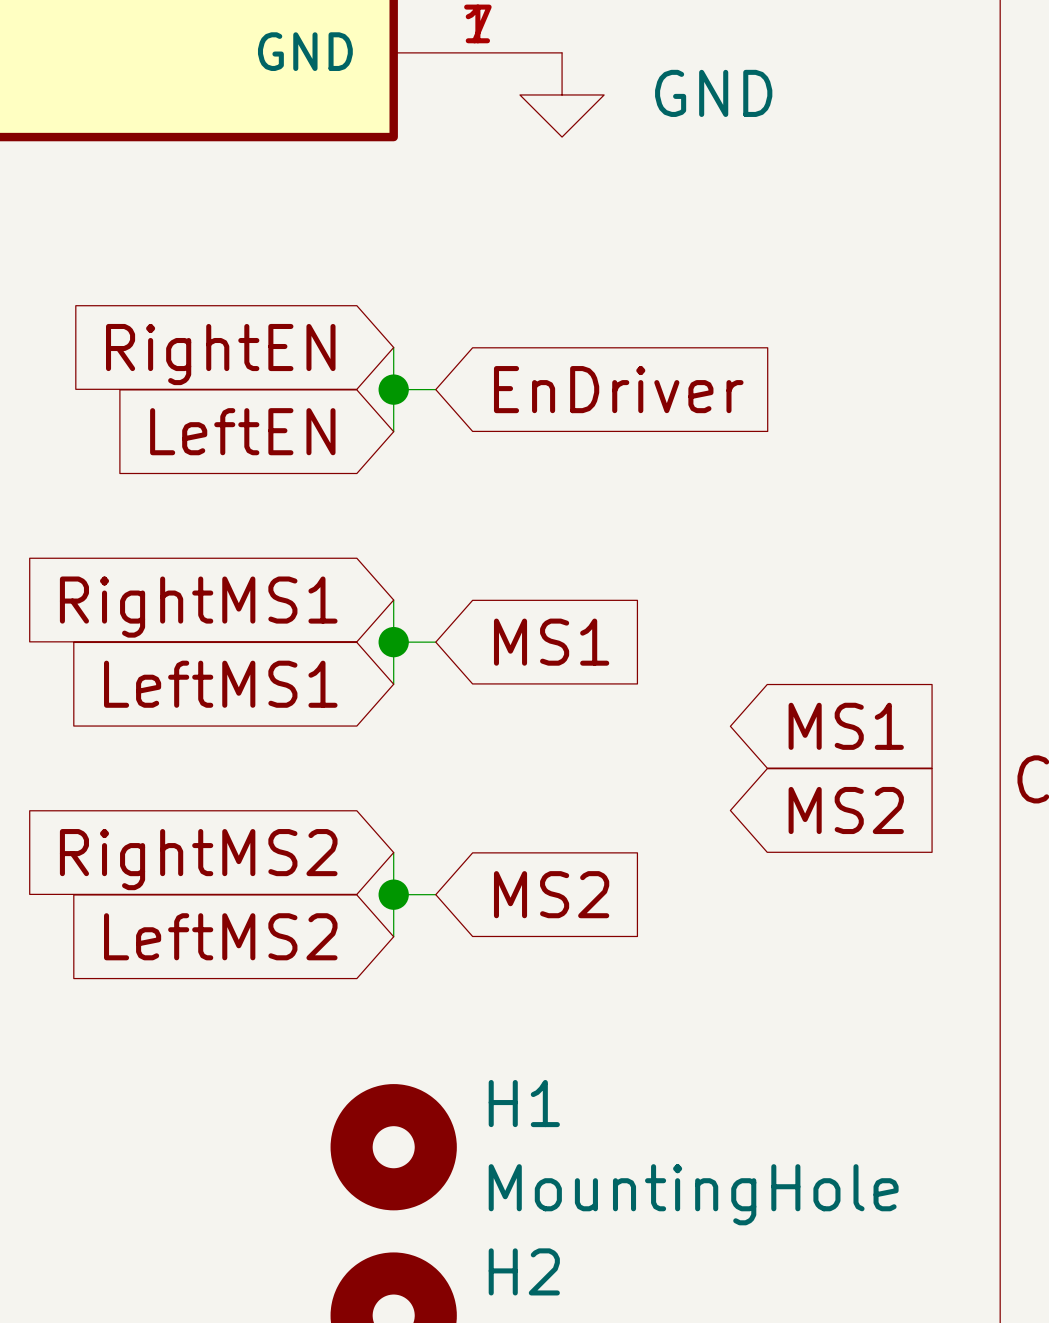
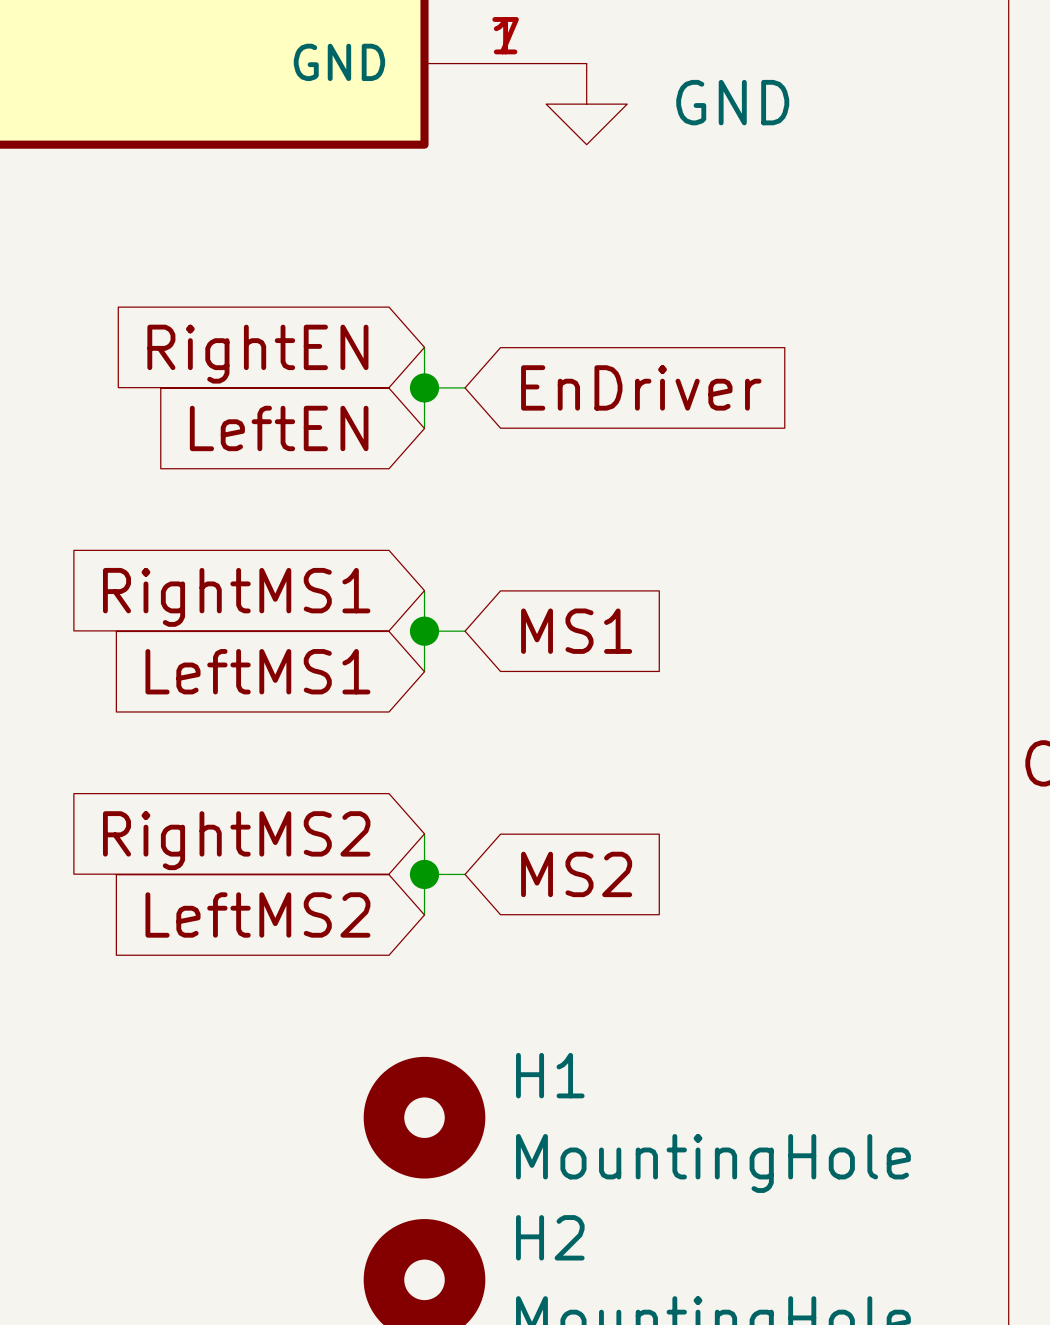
global label: MS1 (846, 726) -> none
global label: MS2 (846, 810) -> none

